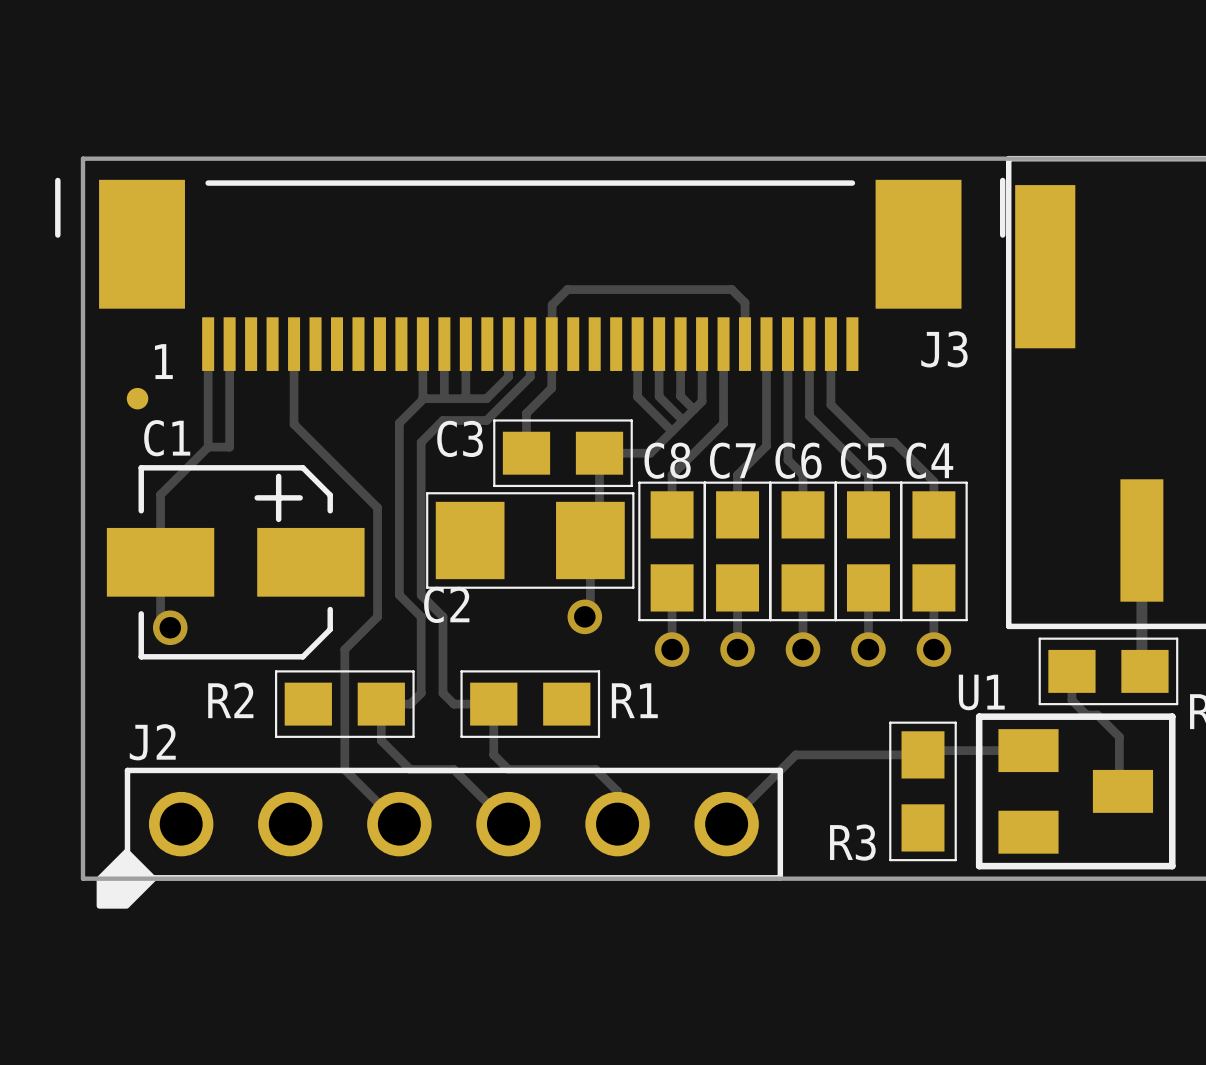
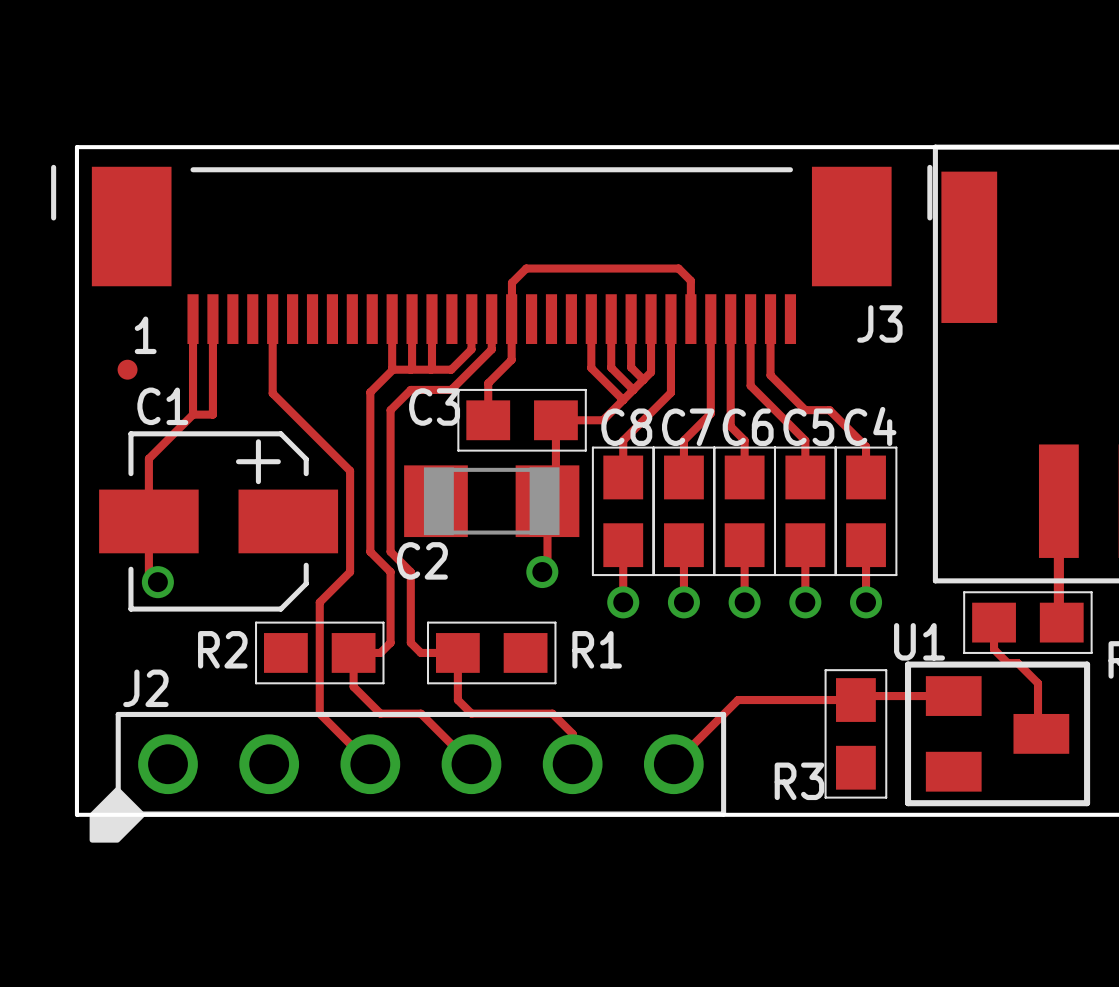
C2 footprint: [426, 492, 635, 589] -> [404, 465, 580, 538]

